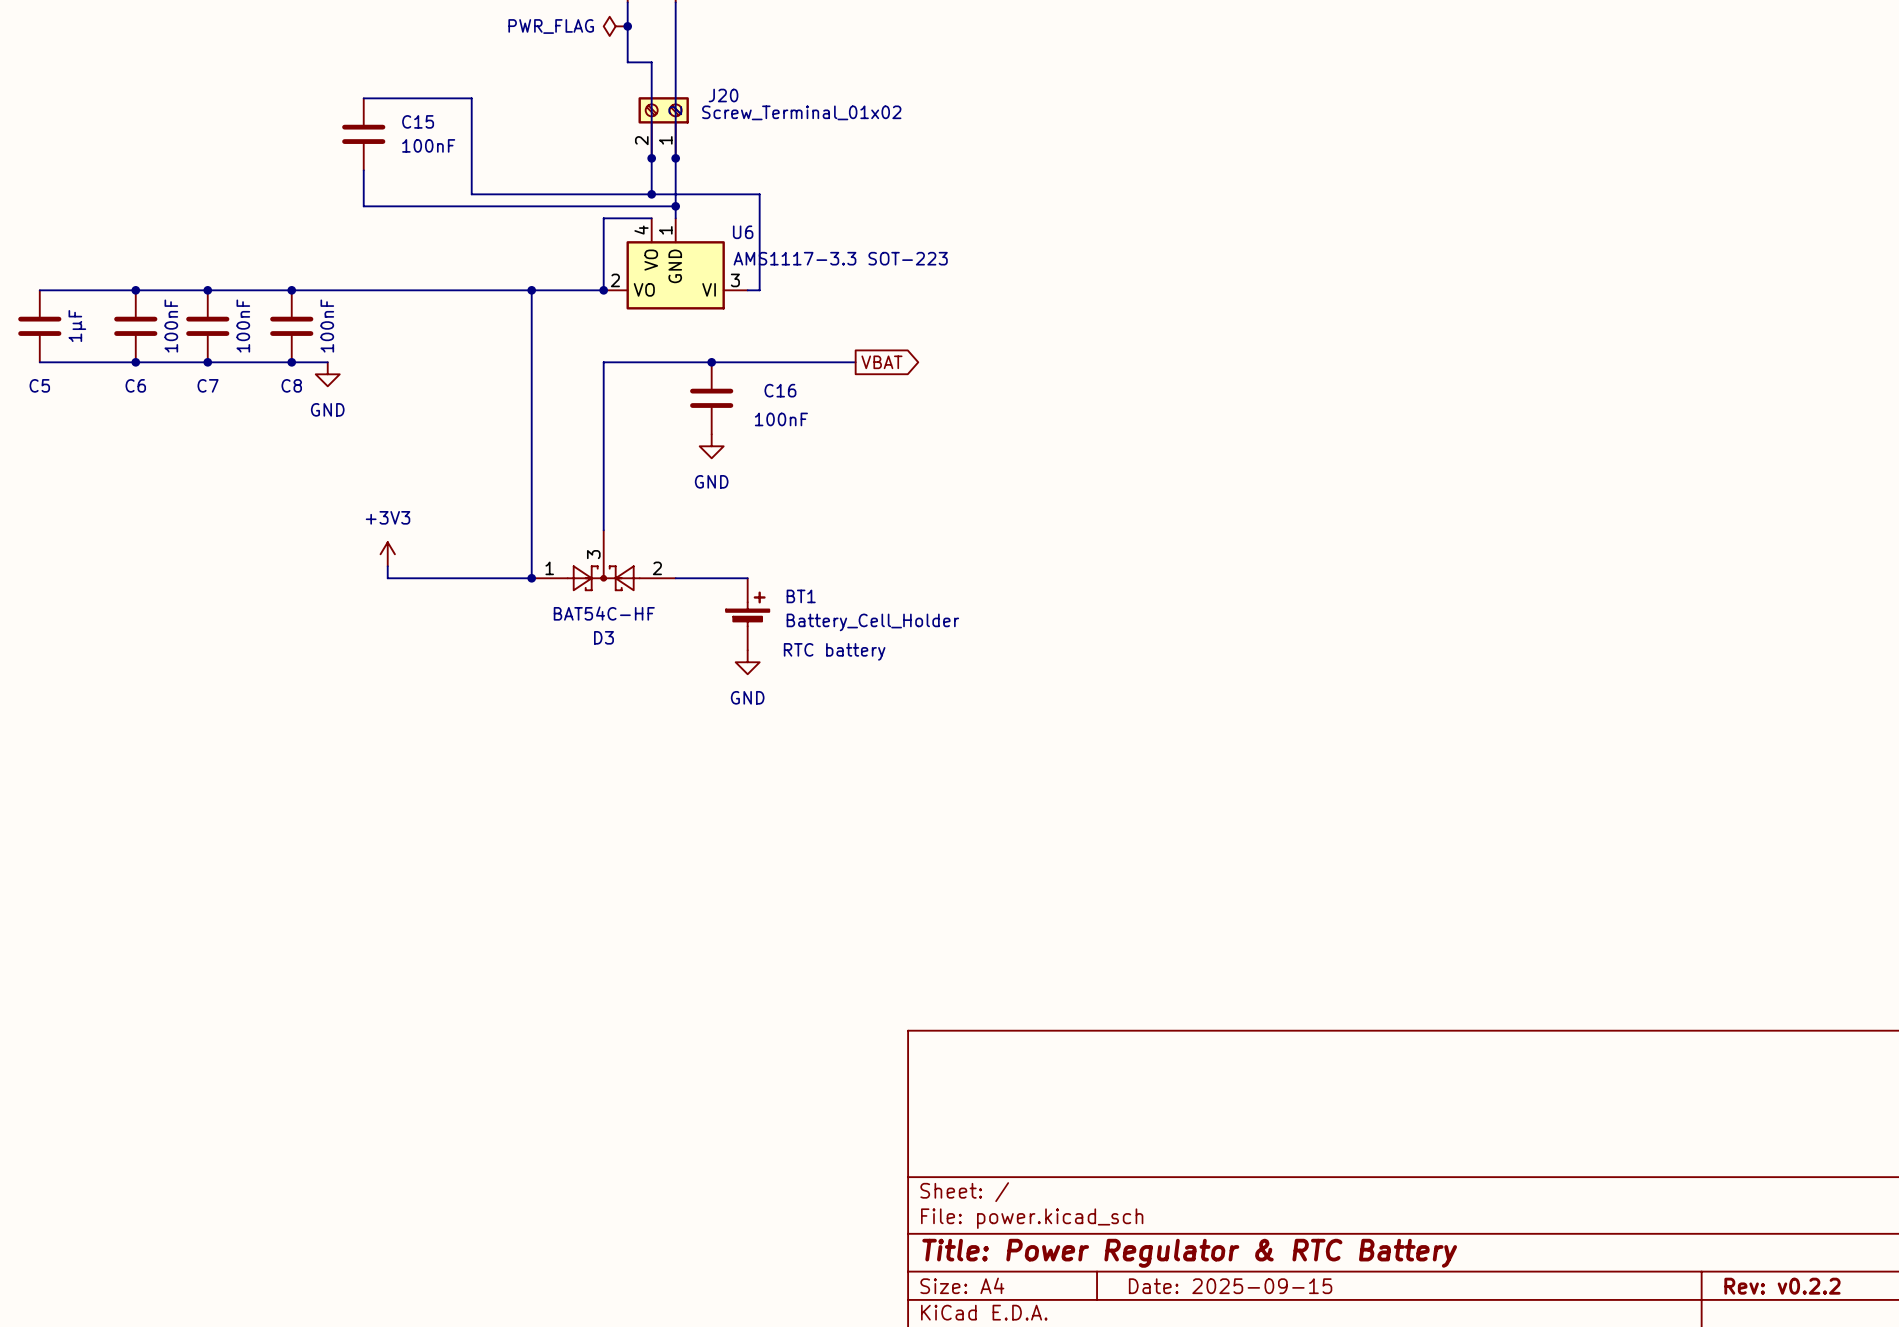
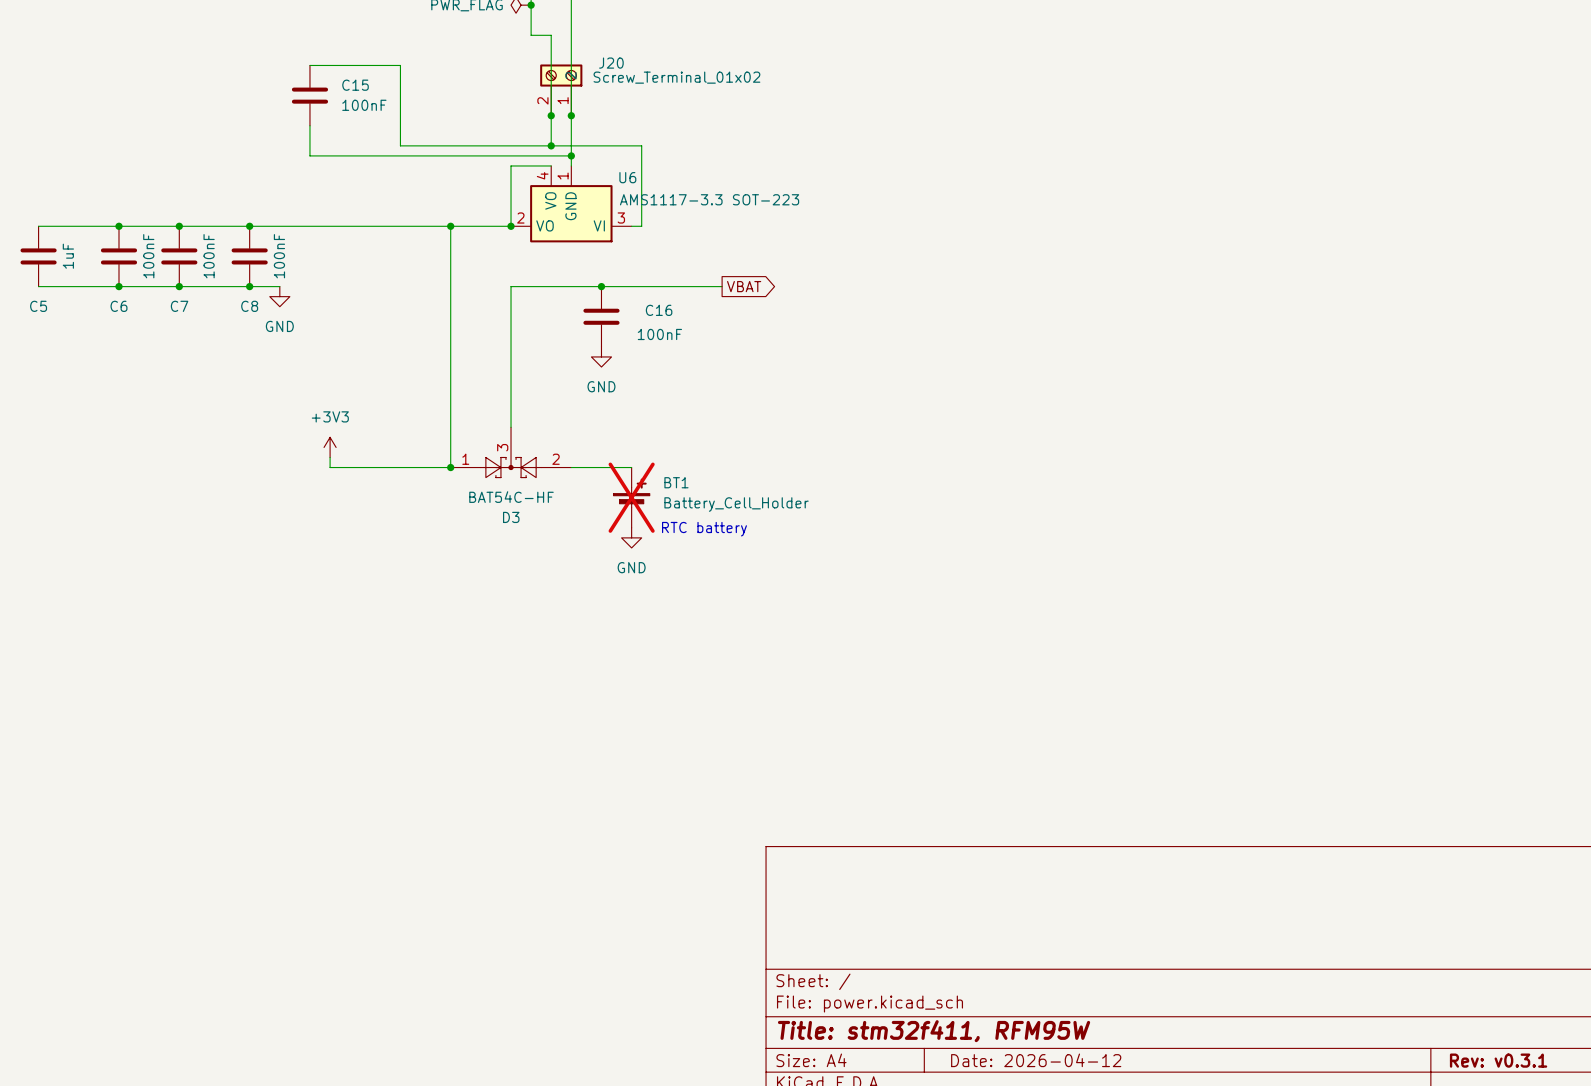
C5 value: 1µF (77, 326) -> 1uF (68, 256)
BT1 do-not-place cross: none -> (631, 497)
title block: Title: Power Regulator & RTC Battery (1189, 1253) -> Title: stm32f411, RFM95W (934, 1031)
title block: Date: 2025-09-15 (1230, 1286) -> Date: 2026-04-12 (1036, 1060)
title block: Rev: v0.2.2 (1782, 1286) -> Rev: v0.3.1 (1498, 1060)

